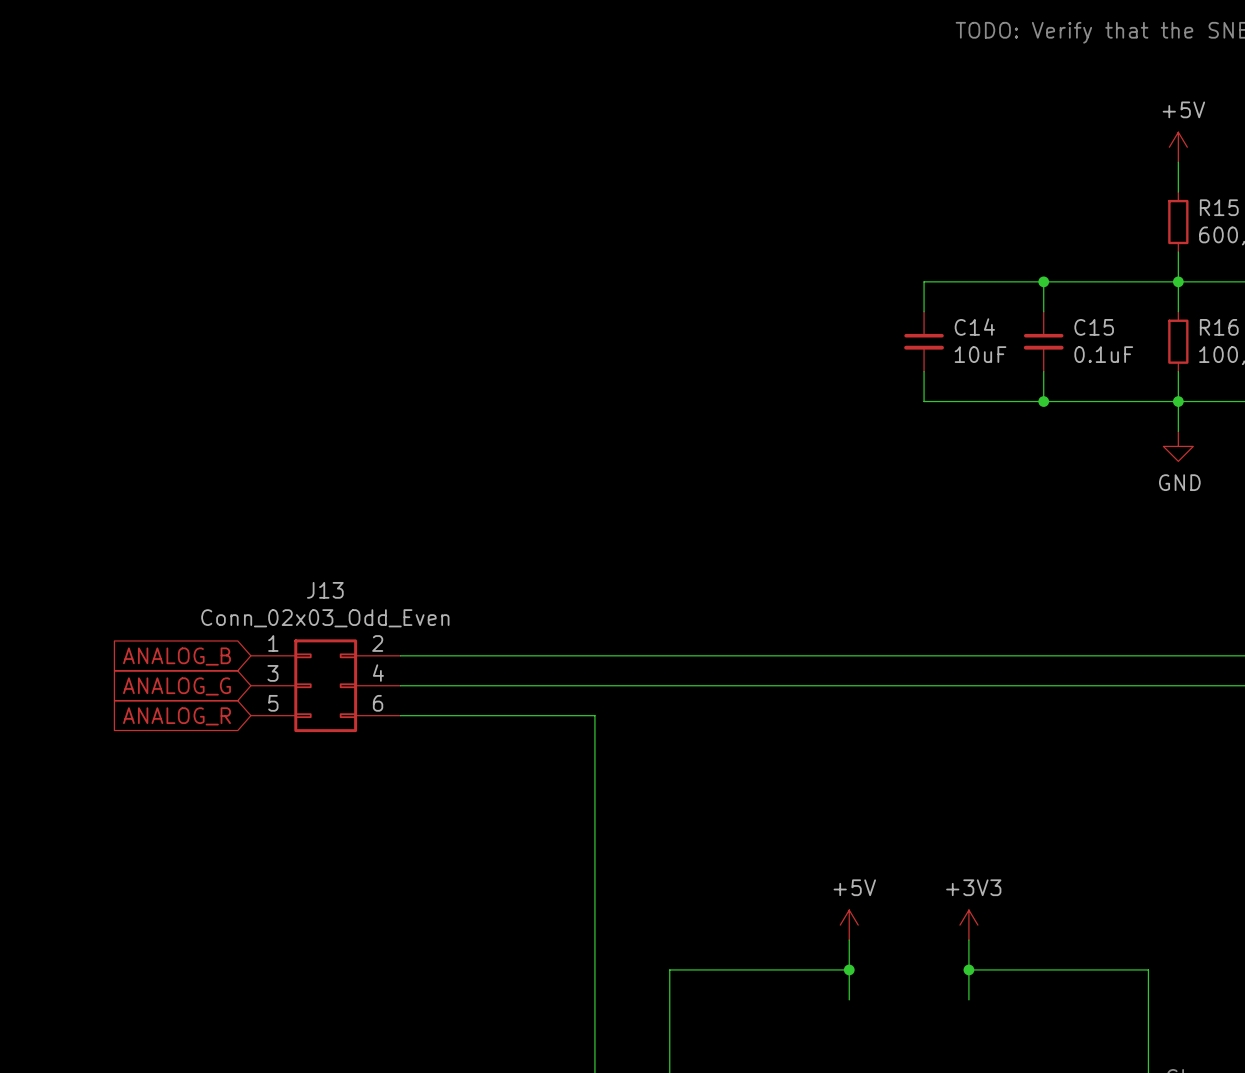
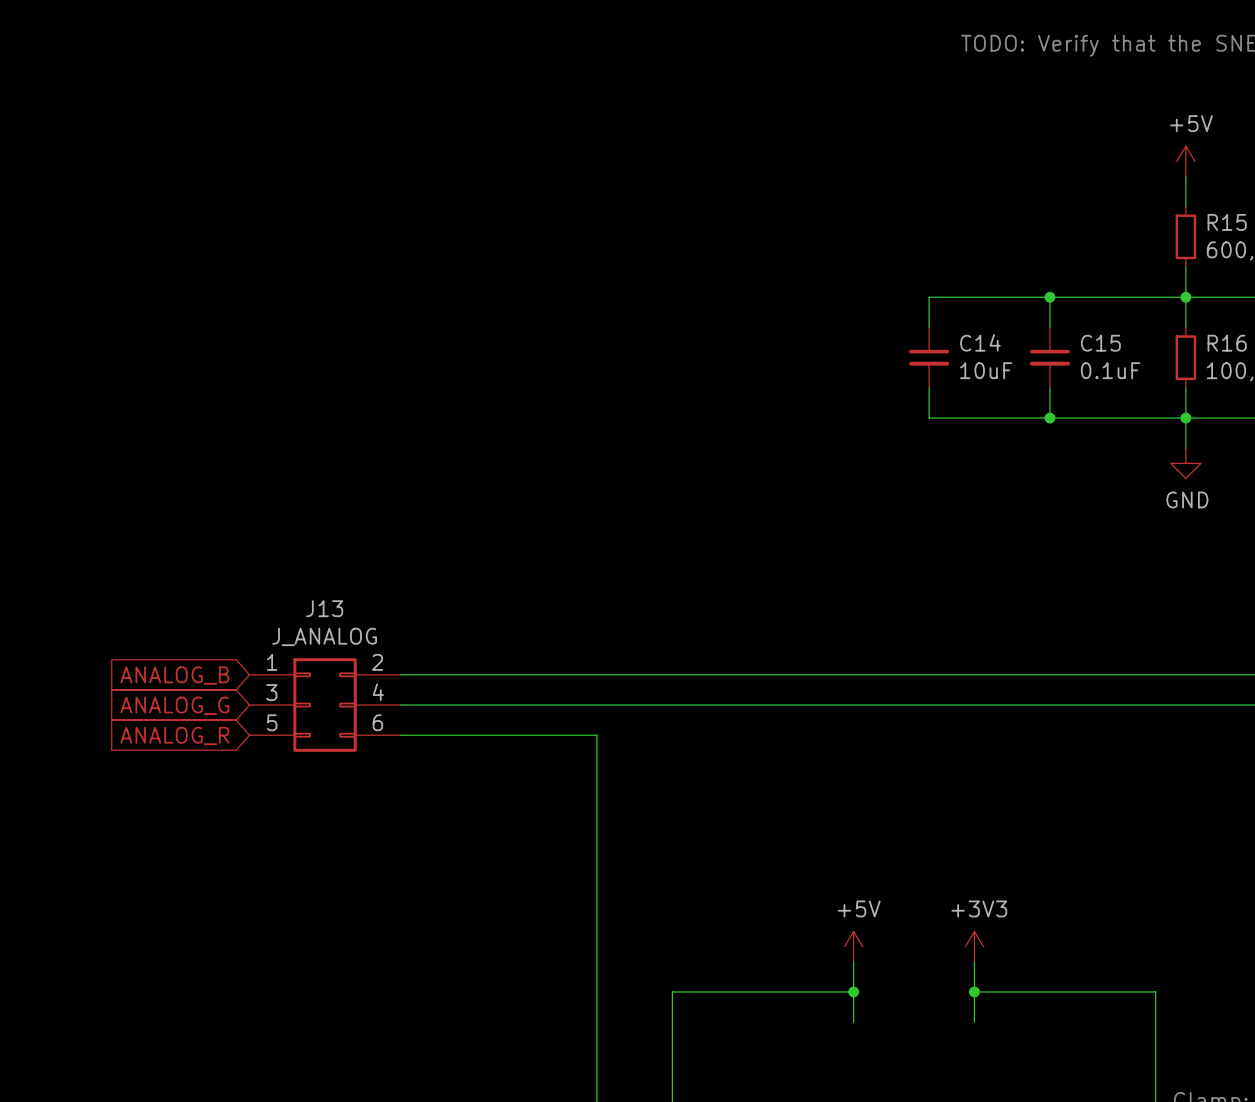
J13 value: Conn_02x03_Odd_Even (325, 618) -> J_ANALOG (324, 636)

